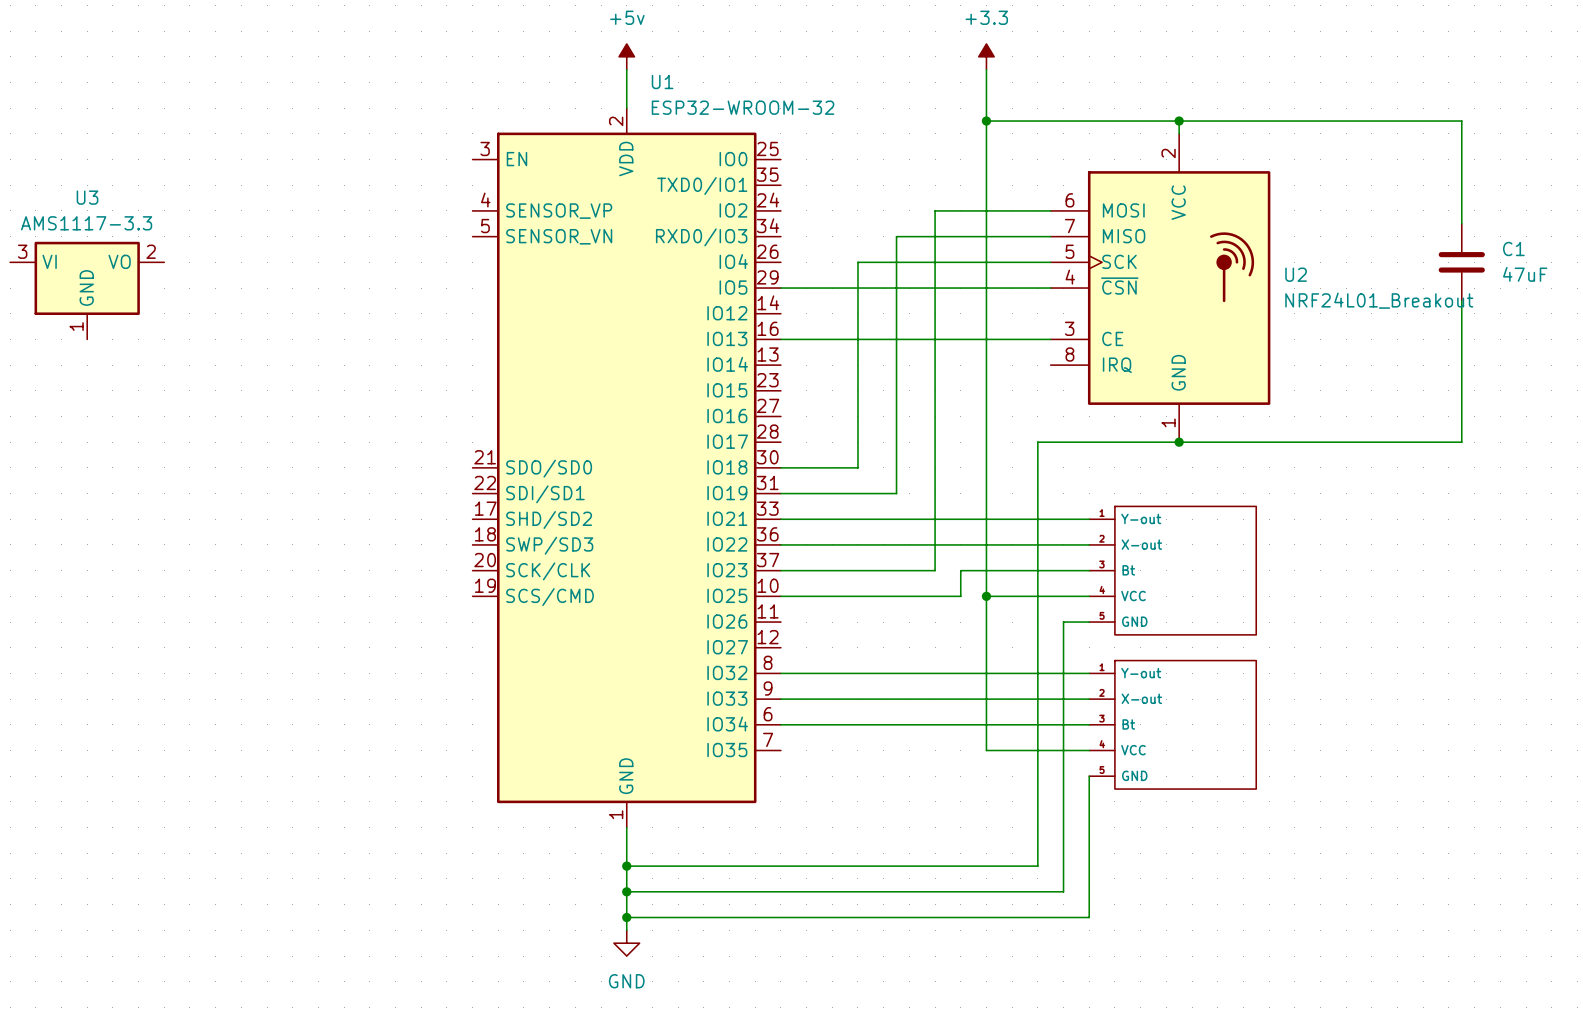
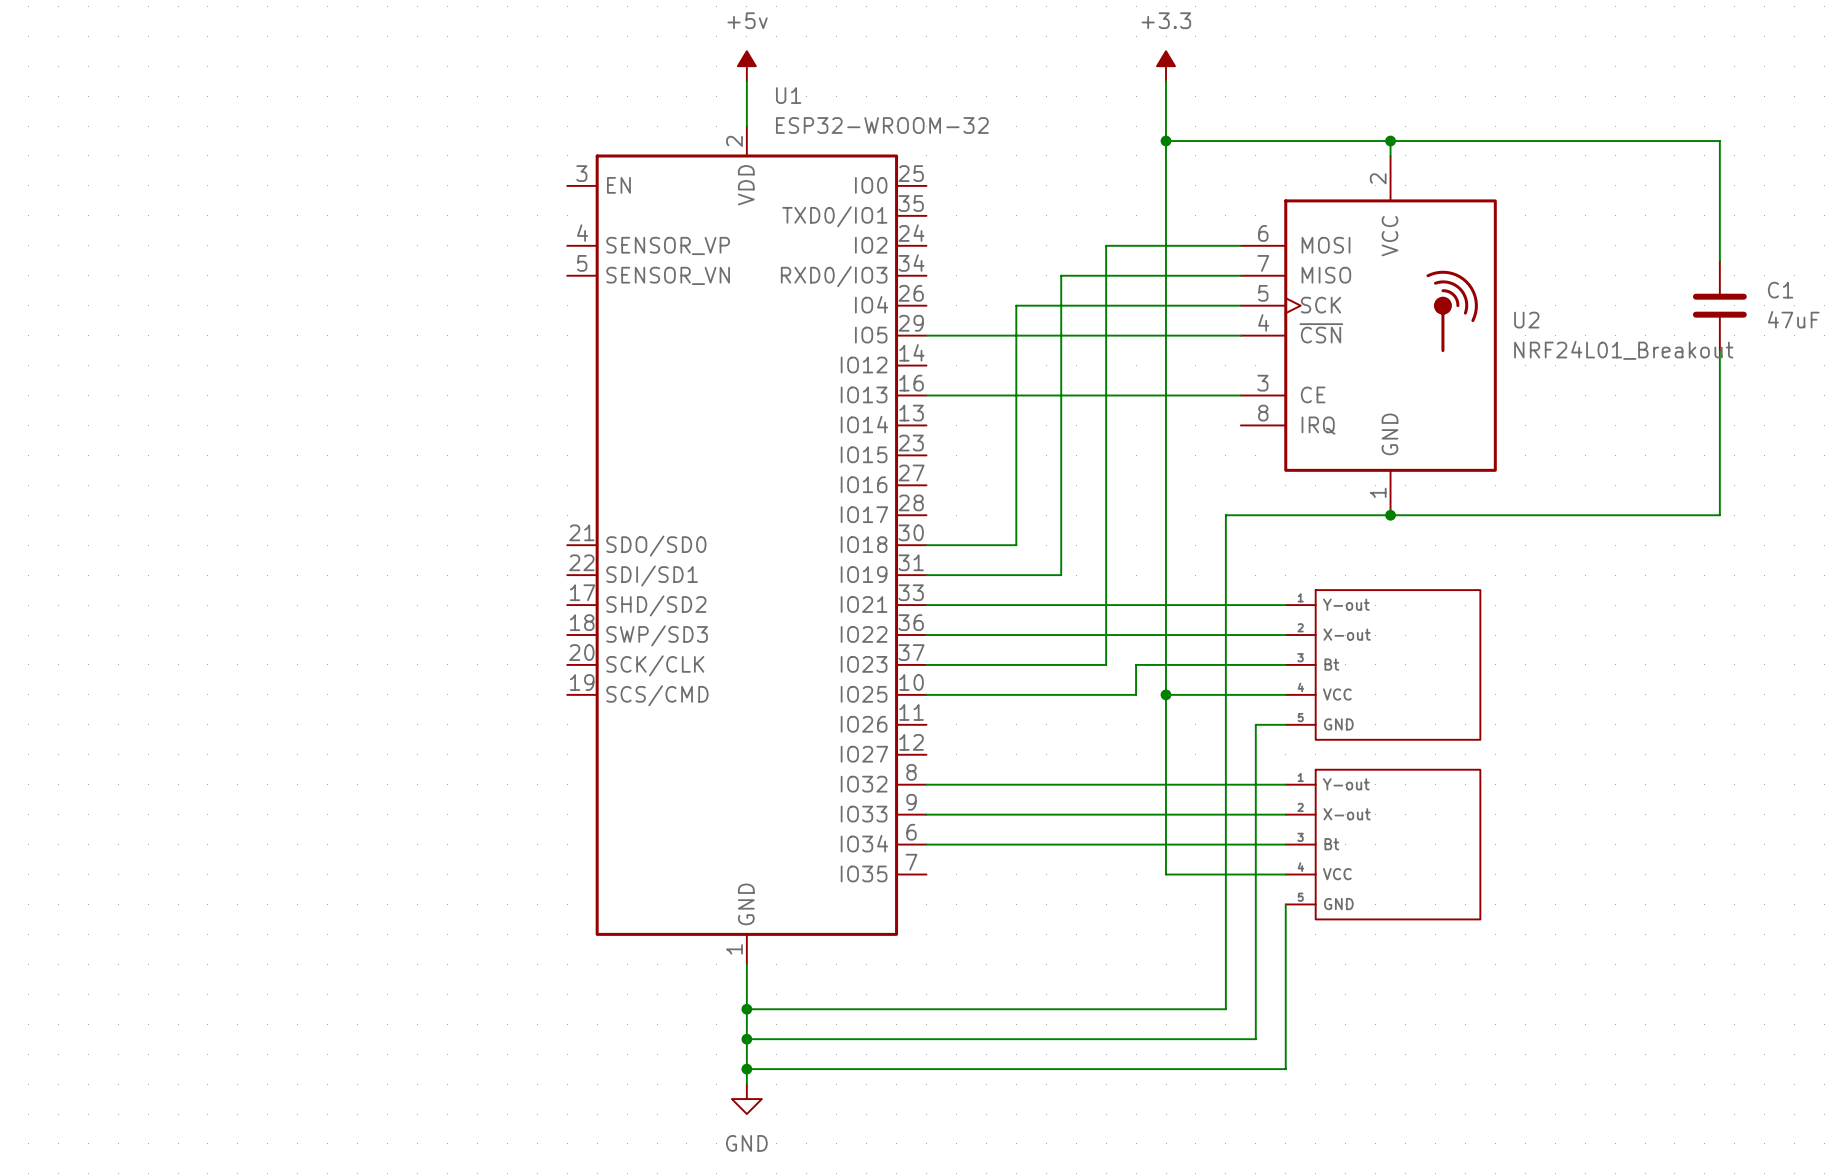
U3: AMS1117-3.3 (87, 290) -> none

